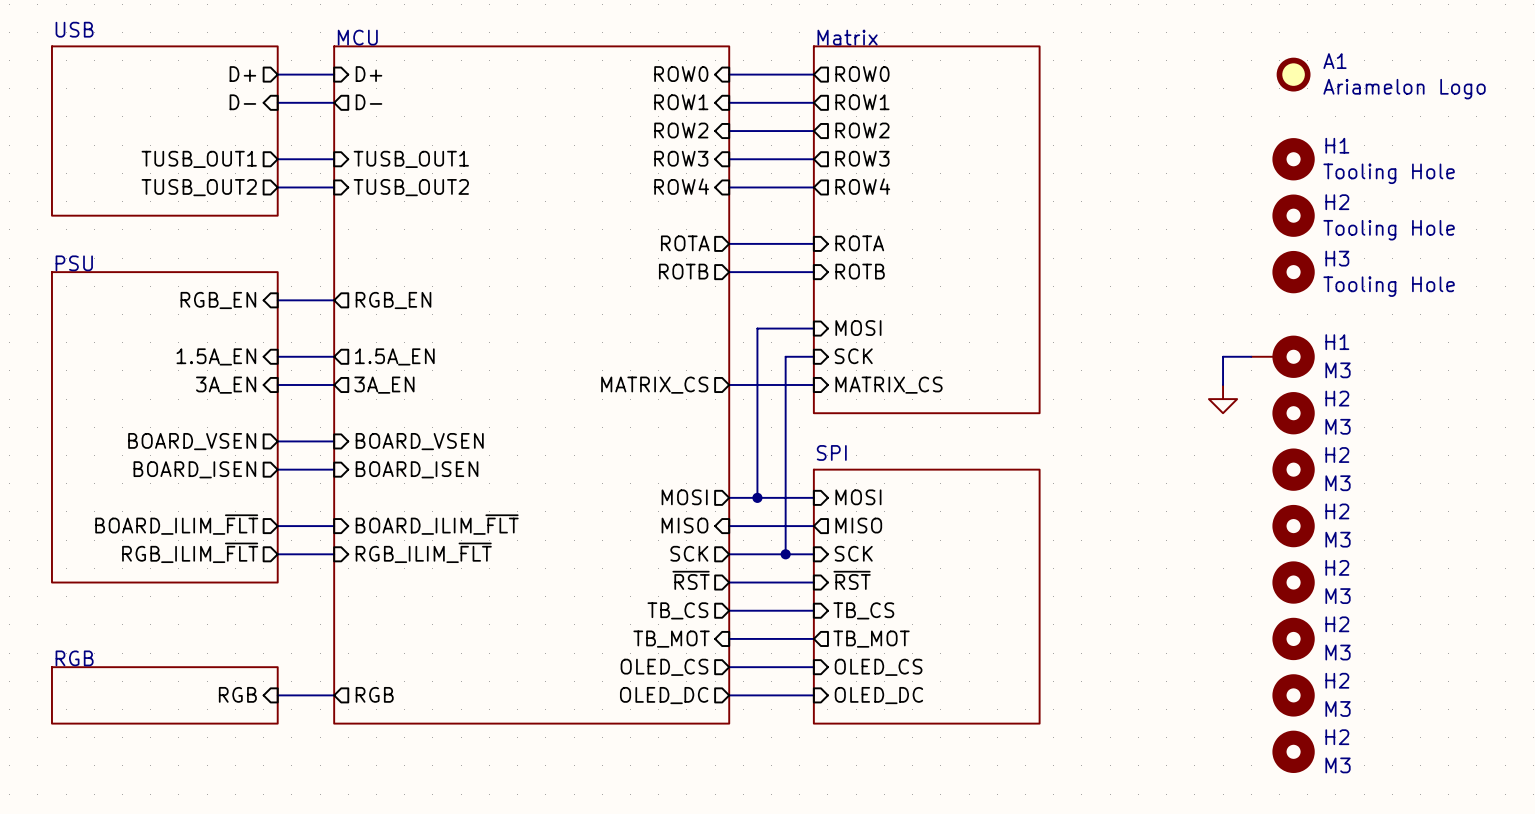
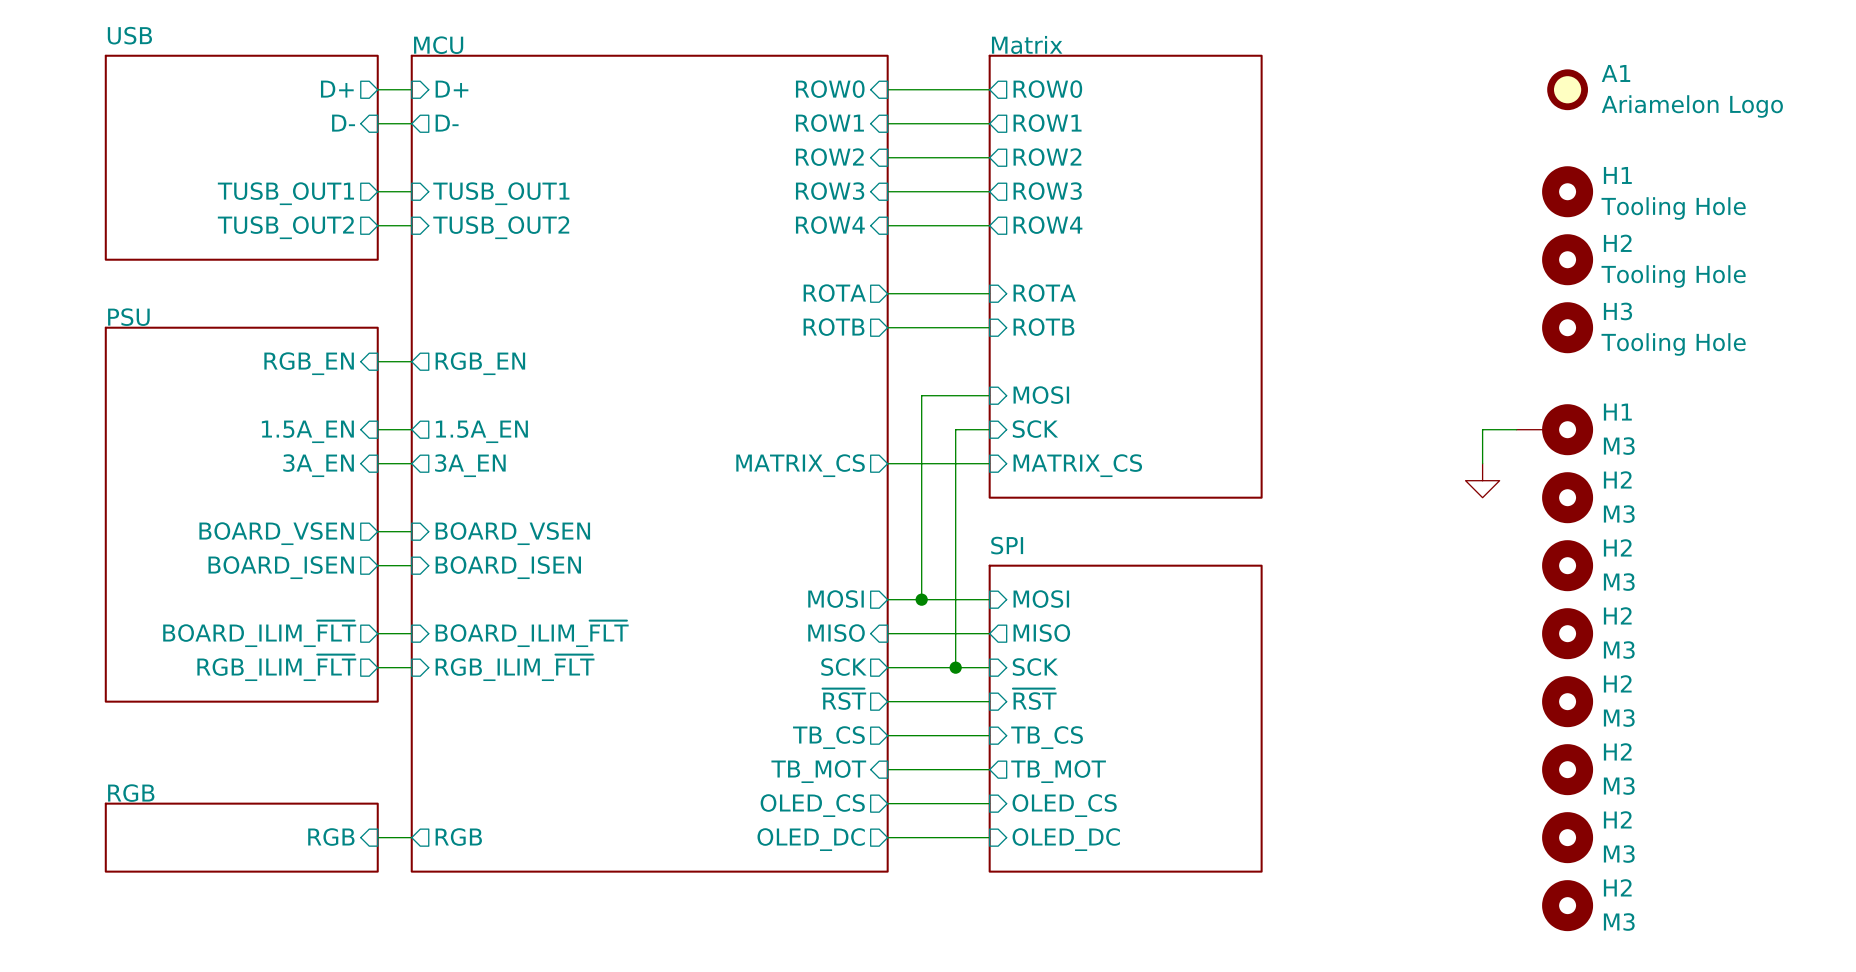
sheet pin position: D+ (242, 74) -> D+ (337, 89)
wire: (277, 74) (305, 74) -> none
sheet pin position: D- (242, 102) -> D- (343, 123)
wire: (277, 102) (305, 102) -> none
sheet USB position: (164, 131) -> (241, 157)
sheet pin position: TUSB_OUT1 (199, 159) -> TUSB_OUT1 (285, 193)
wire: (277, 159) (305, 159) -> none
sheet pin position: TUSB_OUT2 (199, 187) -> TUSB_OUT2 (285, 227)
wire: (277, 187) (305, 187) -> none
sheet pin position: RGB_EN (218, 300) -> RGB_EN (309, 363)
wire: (277, 300) (305, 300) -> none
sheet pin position: 1.5A_EN (216, 356) -> 1.5A_EN (307, 431)
wire: (277, 356) (305, 356) -> none
wire: (277, 384) (305, 384) -> none
sheet pin position: 3A_EN (226, 385) -> 3A_EN (318, 465)
sheet PSU position: (164, 427) -> (241, 514)
sheet pin position: BOARD_VSEN (192, 441) -> BOARD_VSEN (276, 533)
wire: (277, 441) (305, 441) -> none
sheet pin position: BOARD_ISEN (194, 469) -> BOARD_ISEN (281, 567)
wire: (277, 469) (305, 469) -> none
sheet pin position: BOARD_ILIM_~{FLT} (176, 524) -> BOARD_ILIM_~{FLT} (259, 633)
wire: (277, 526) (305, 526) -> none
sheet pin position: RGB_ILIM_~{FLT} (190, 552) -> RGB_ILIM_~{FLT} (276, 667)
wire: (277, 554) (305, 554) -> none
sheet pin position: RGB (237, 694) -> RGB (331, 837)
sheet RGB position: (164, 695) -> (241, 837)
wire: (277, 695) (305, 695) -> none

